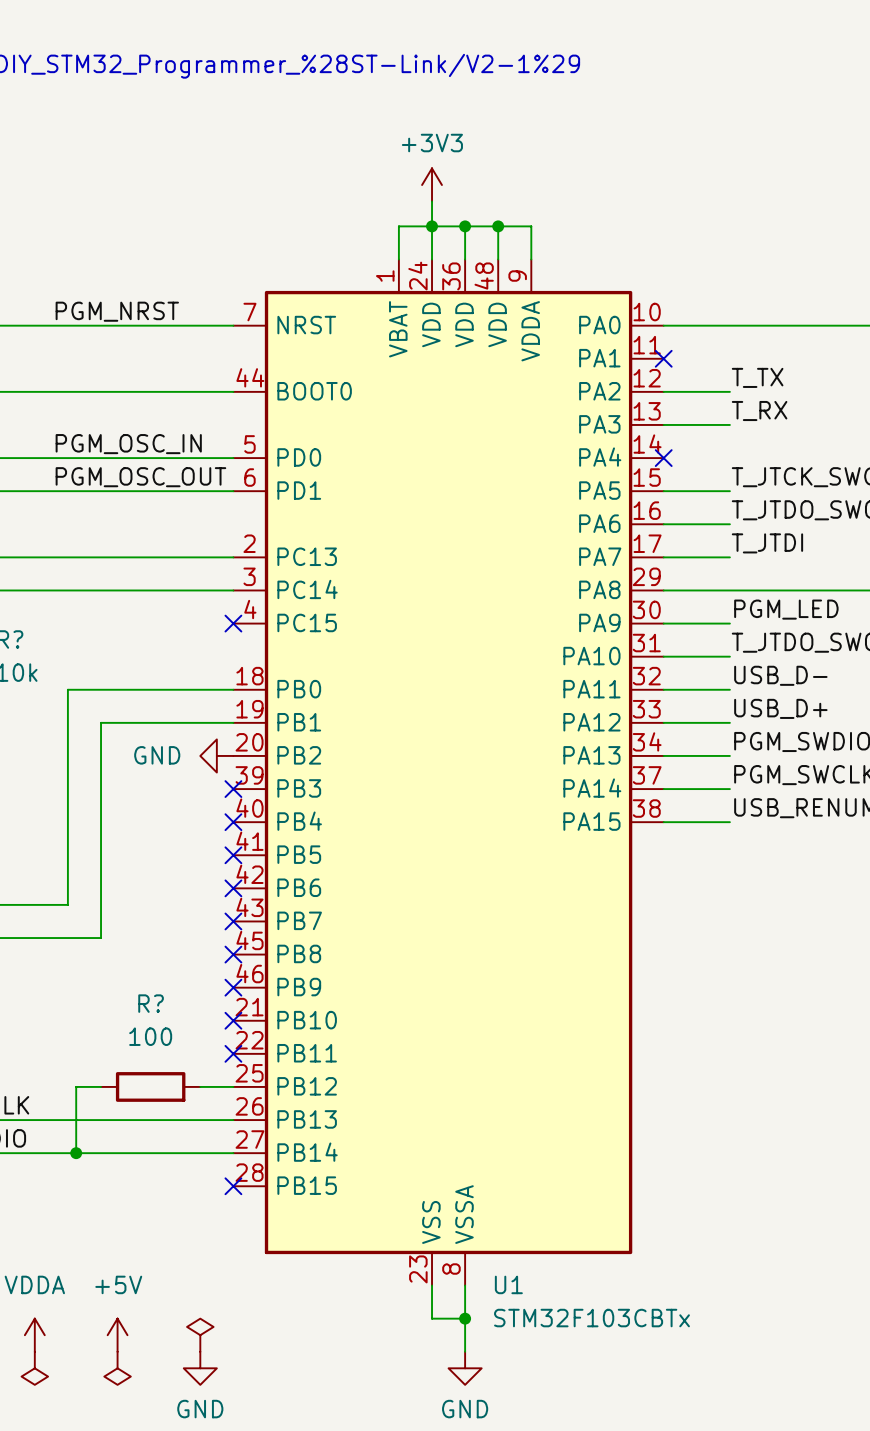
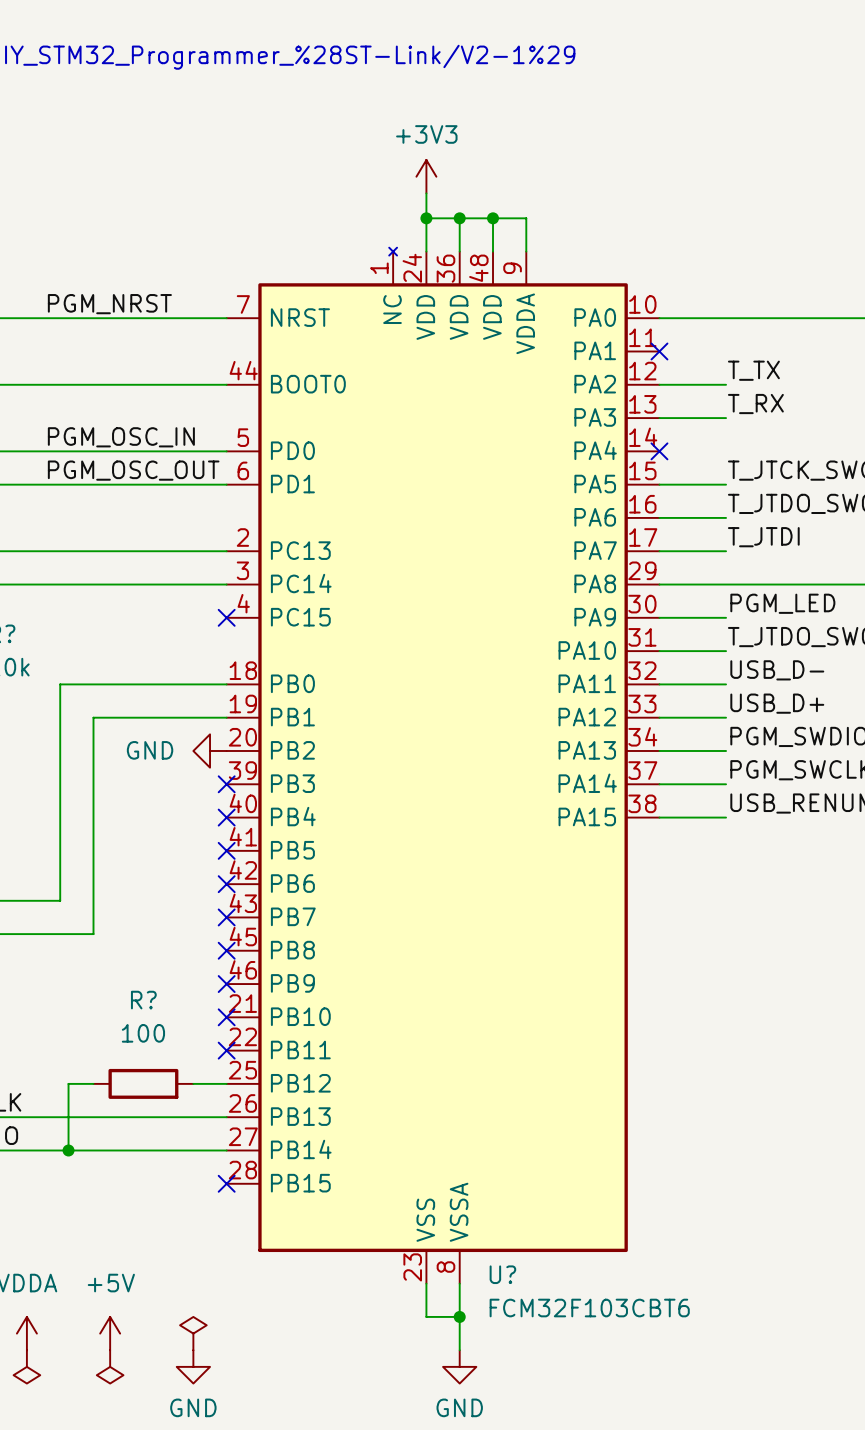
wire: (432, 226) (398, 226) (398, 259) -> none
U?: none -> FCM32F103CBT6 (443, 765)
U1: STM32F103CBTx (448, 772) -> none

